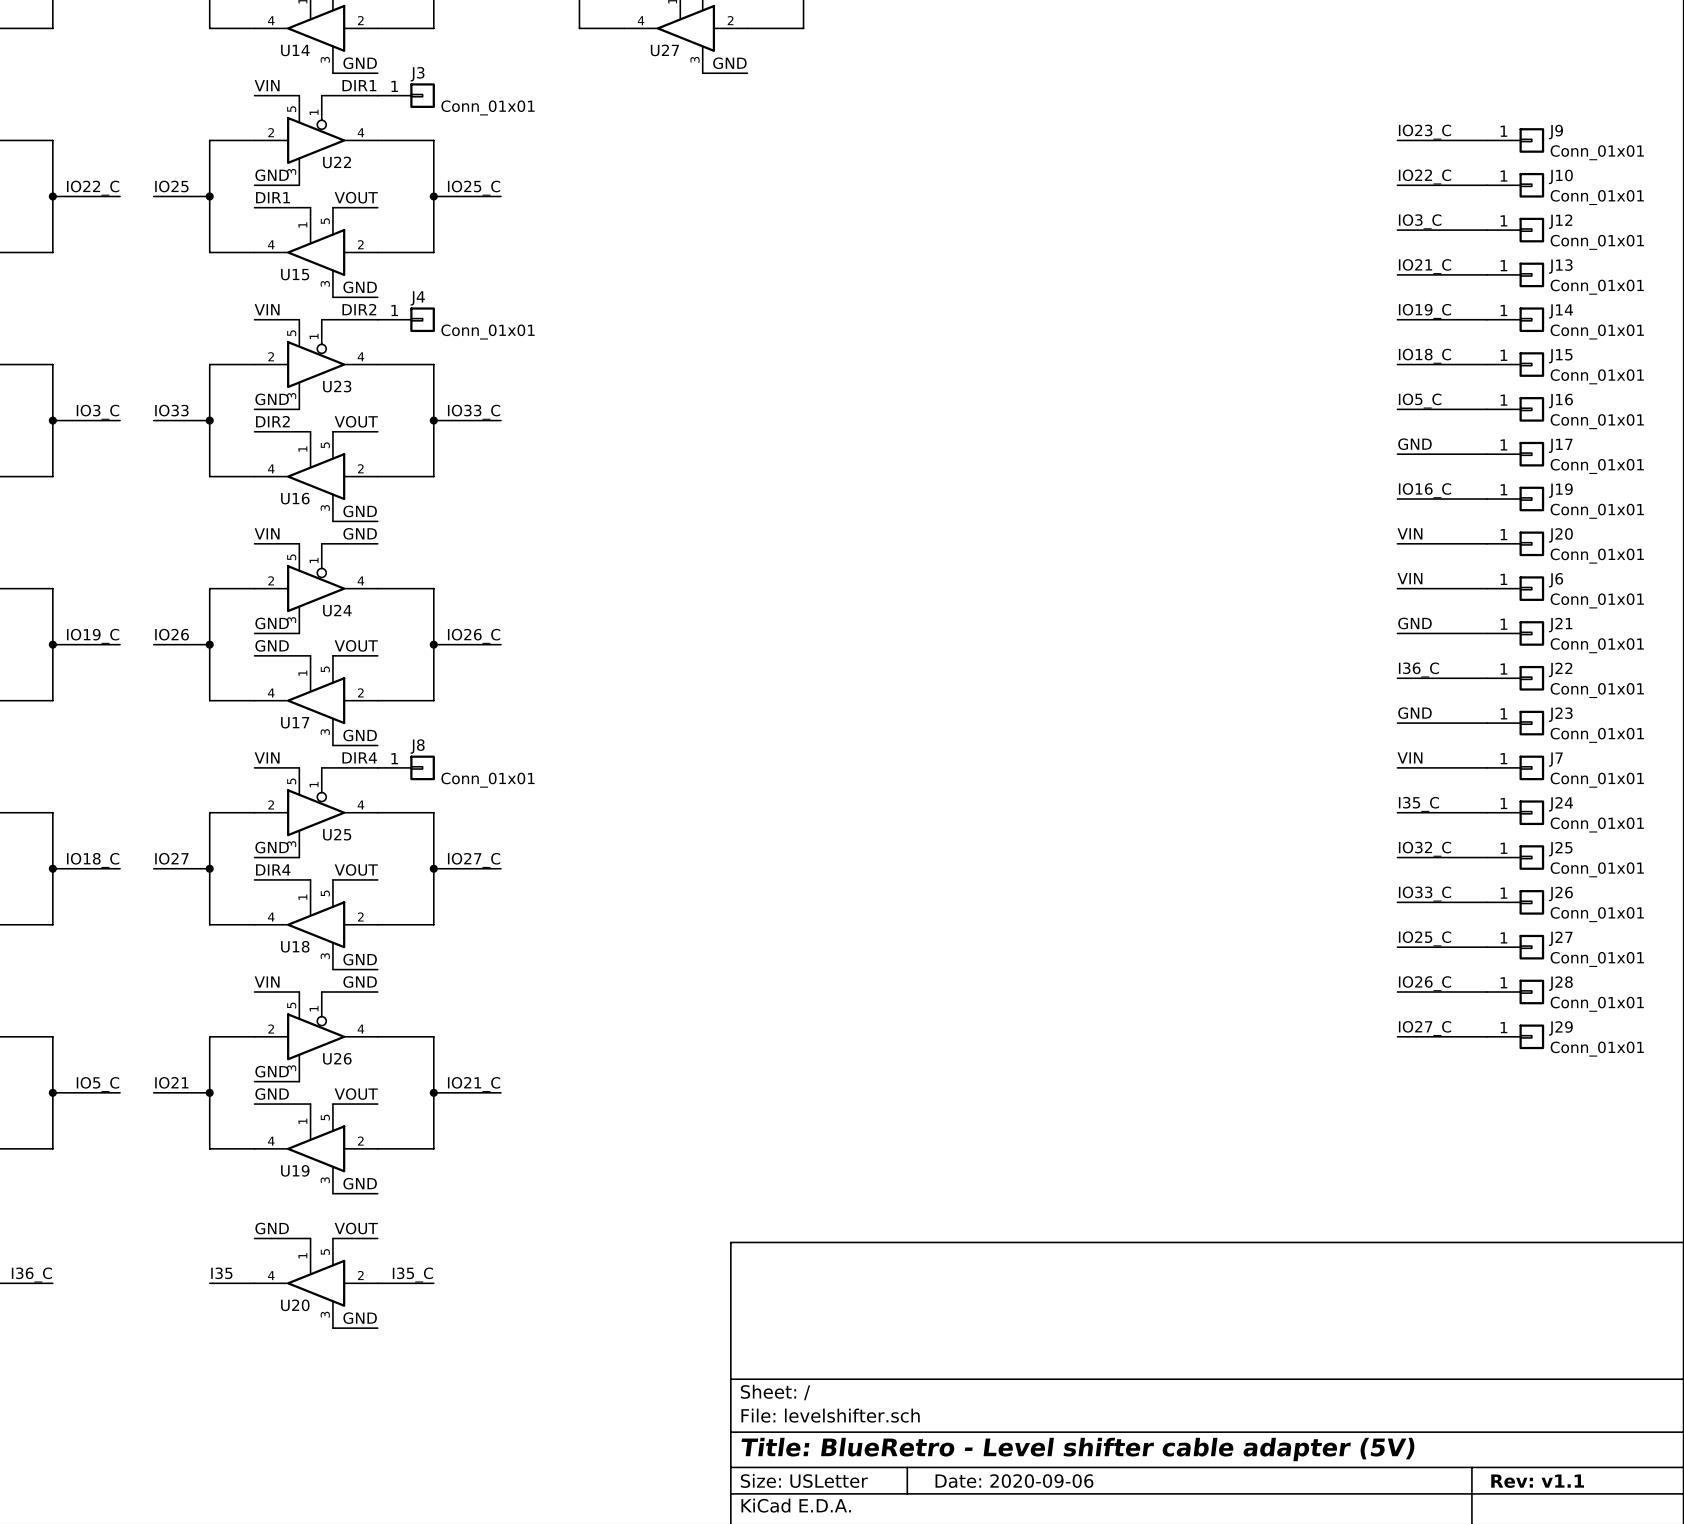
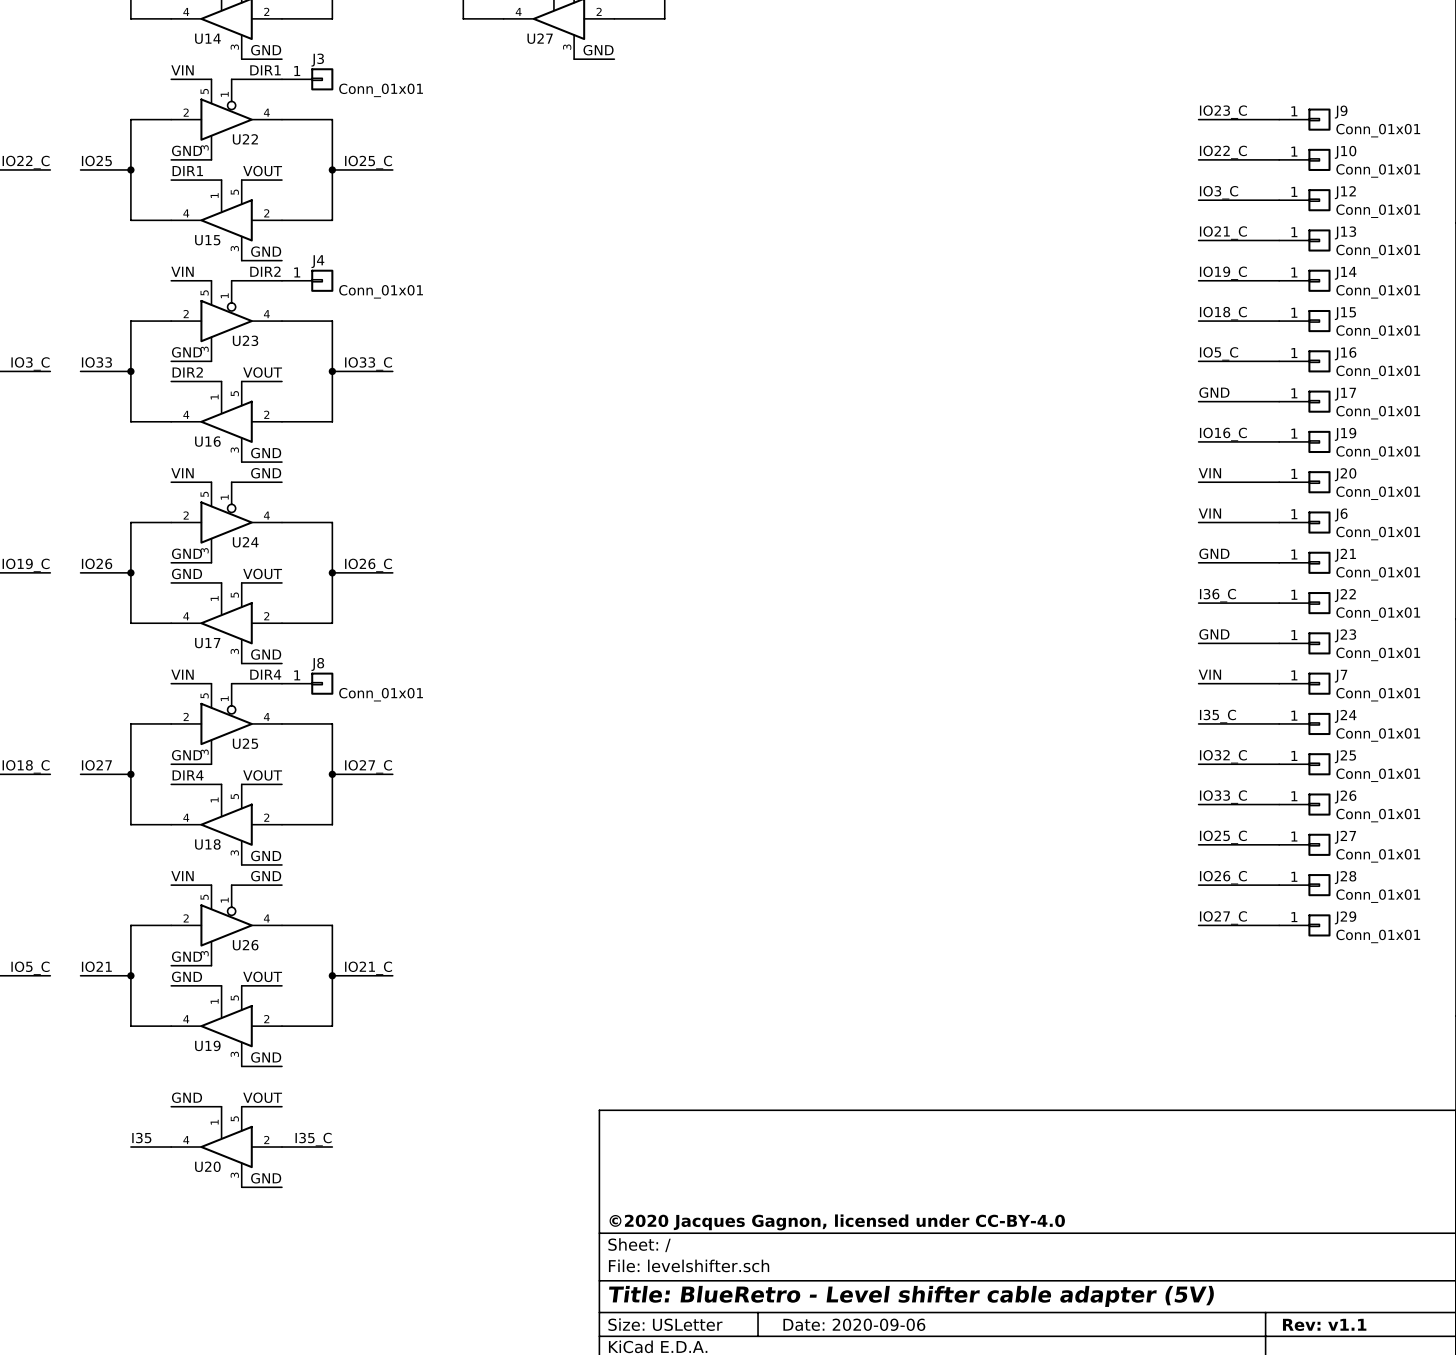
title block: none -> ©2020 Jacques Gagnon, licensed under CC-BY-4.0 (837, 1222)

